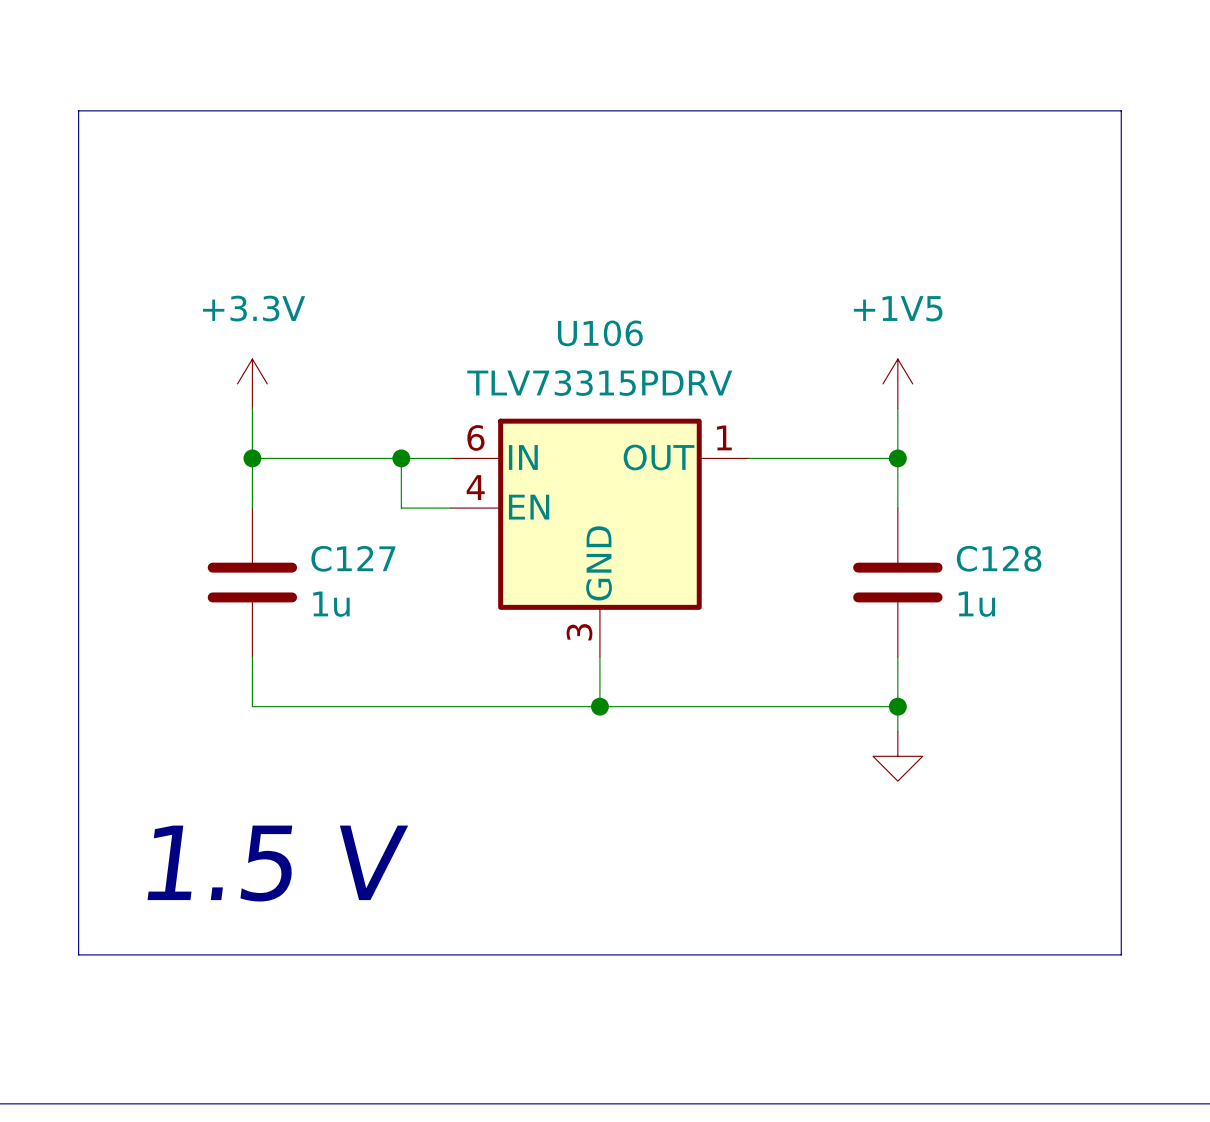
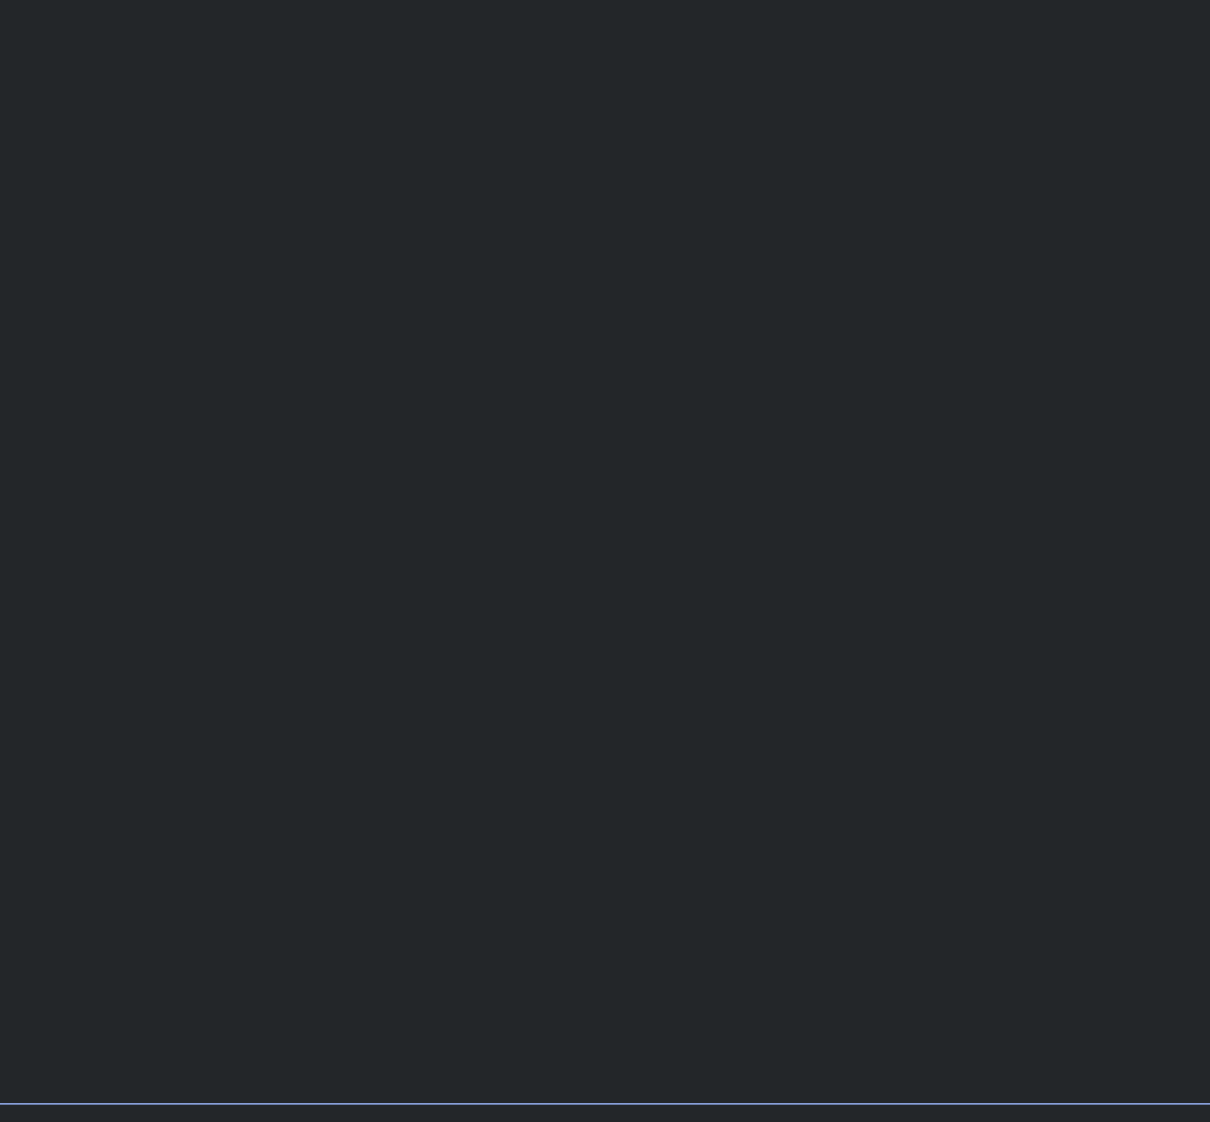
line: (78, 110) (1121, 110) (1121, 954) (78, 954) (78, 110) -> none
power symbol: +3.3V (252, 383) -> none
power symbol: +1V5 (897, 383) -> none
wire: (252, 408) (252, 508) -> none
wire: (897, 408) (897, 508) -> none
wire: (252, 458) (450, 458) -> none
junction: (252, 458) -> none
wire: (401, 458) (401, 508) (450, 508) -> none
junction: (401, 458) -> none
wire: (748, 458) (897, 458) -> none
junction: (897, 458) -> none
U106: TLV73315PDRV (599, 537) -> none
C127: 1u (252, 582) -> none
C128: 1u (897, 582) -> none
wire: (252, 657) (252, 706) (897, 706) -> none
wire: (599, 657) (599, 706) -> none
wire: (897, 657) (897, 731) -> none
junction: (599, 706) -> none
junction: (897, 706) -> none
power symbol: (897, 756) -> none
text: 1.5 V (277, 863) -> none

